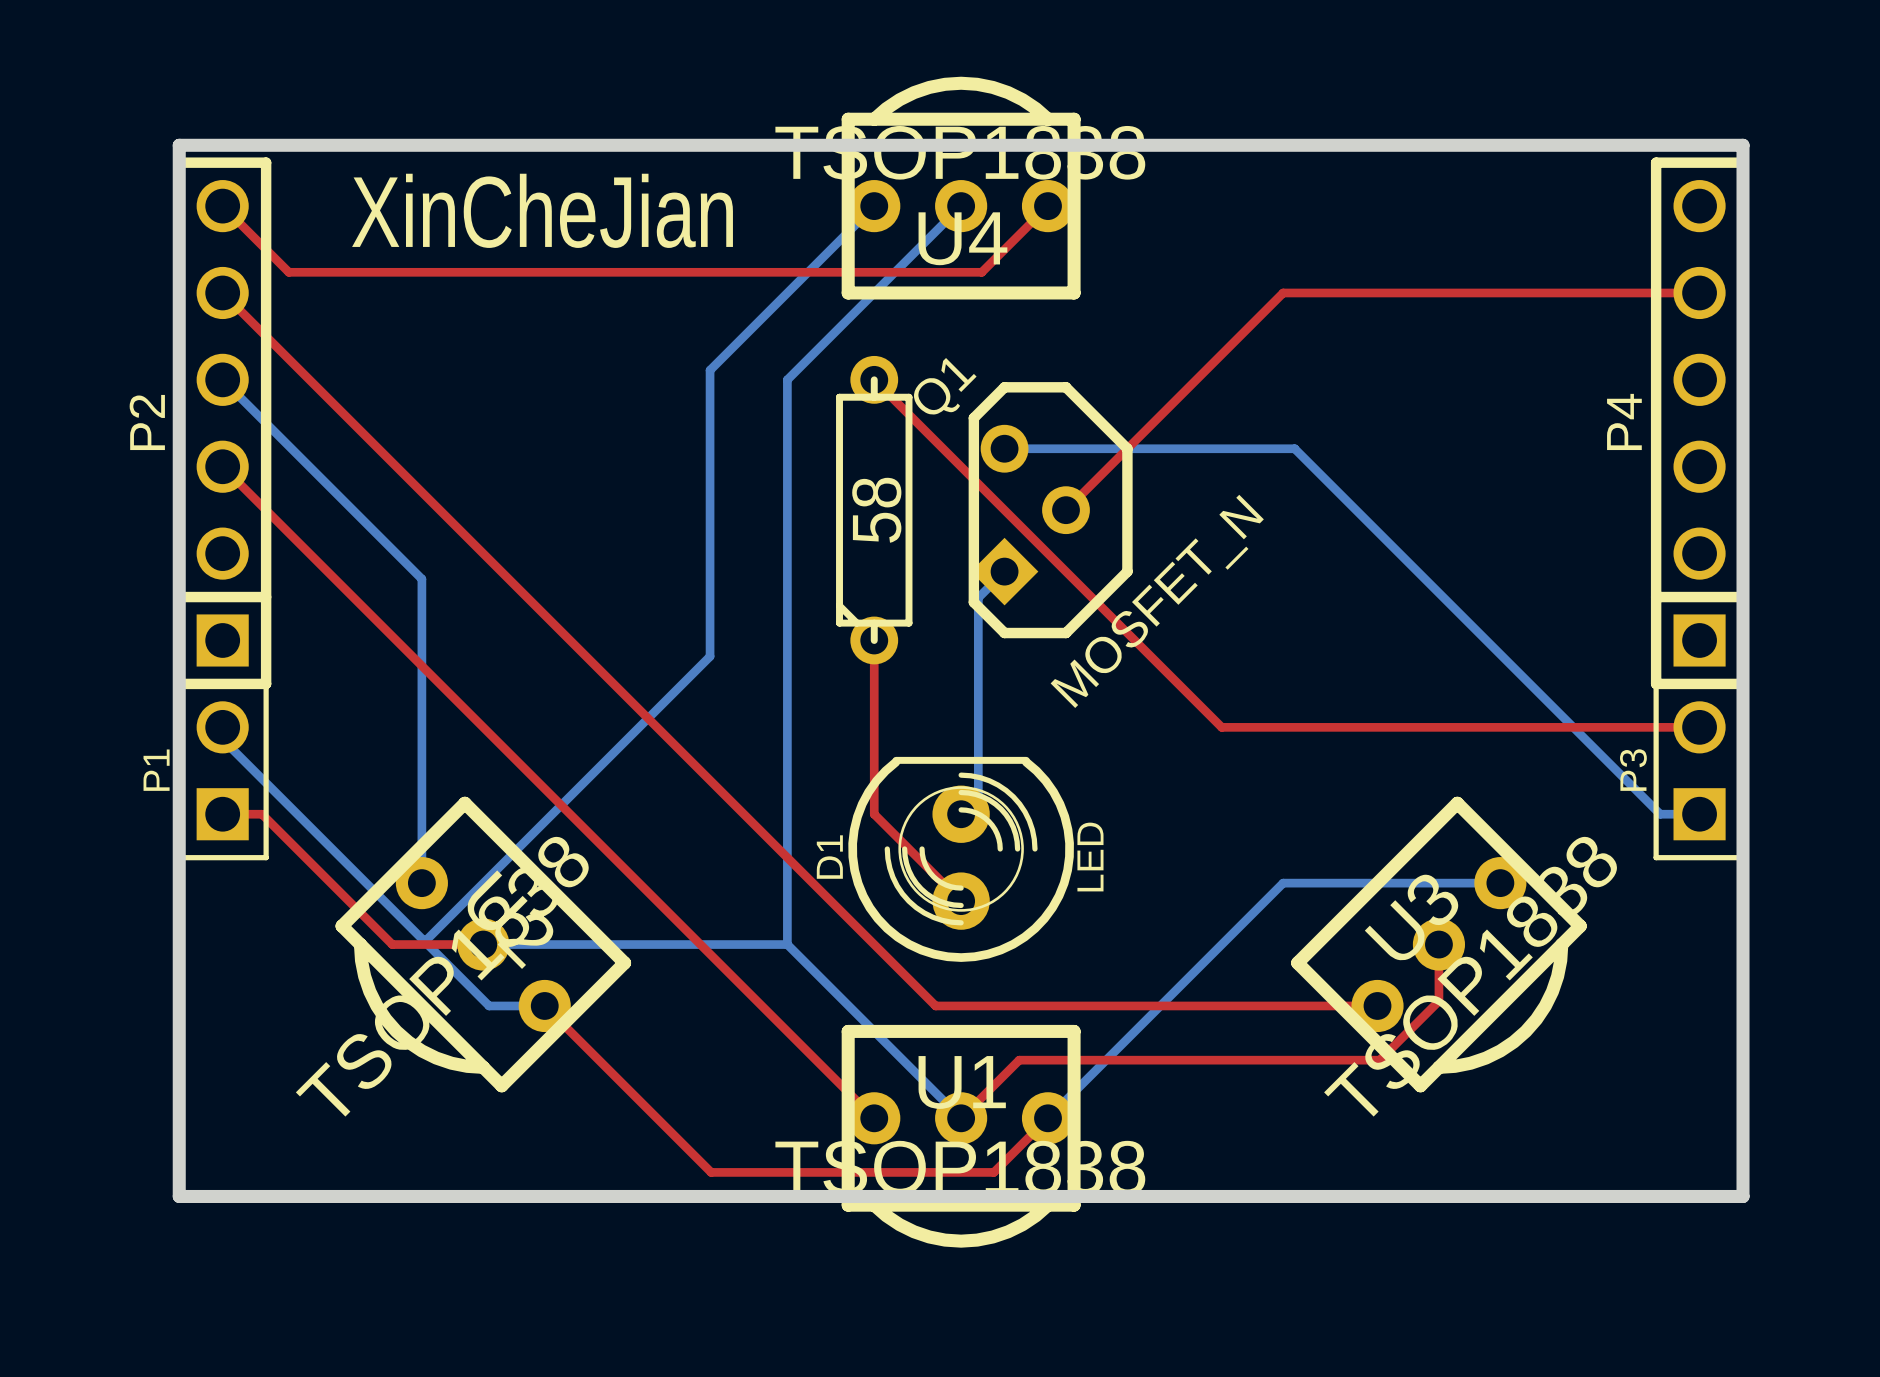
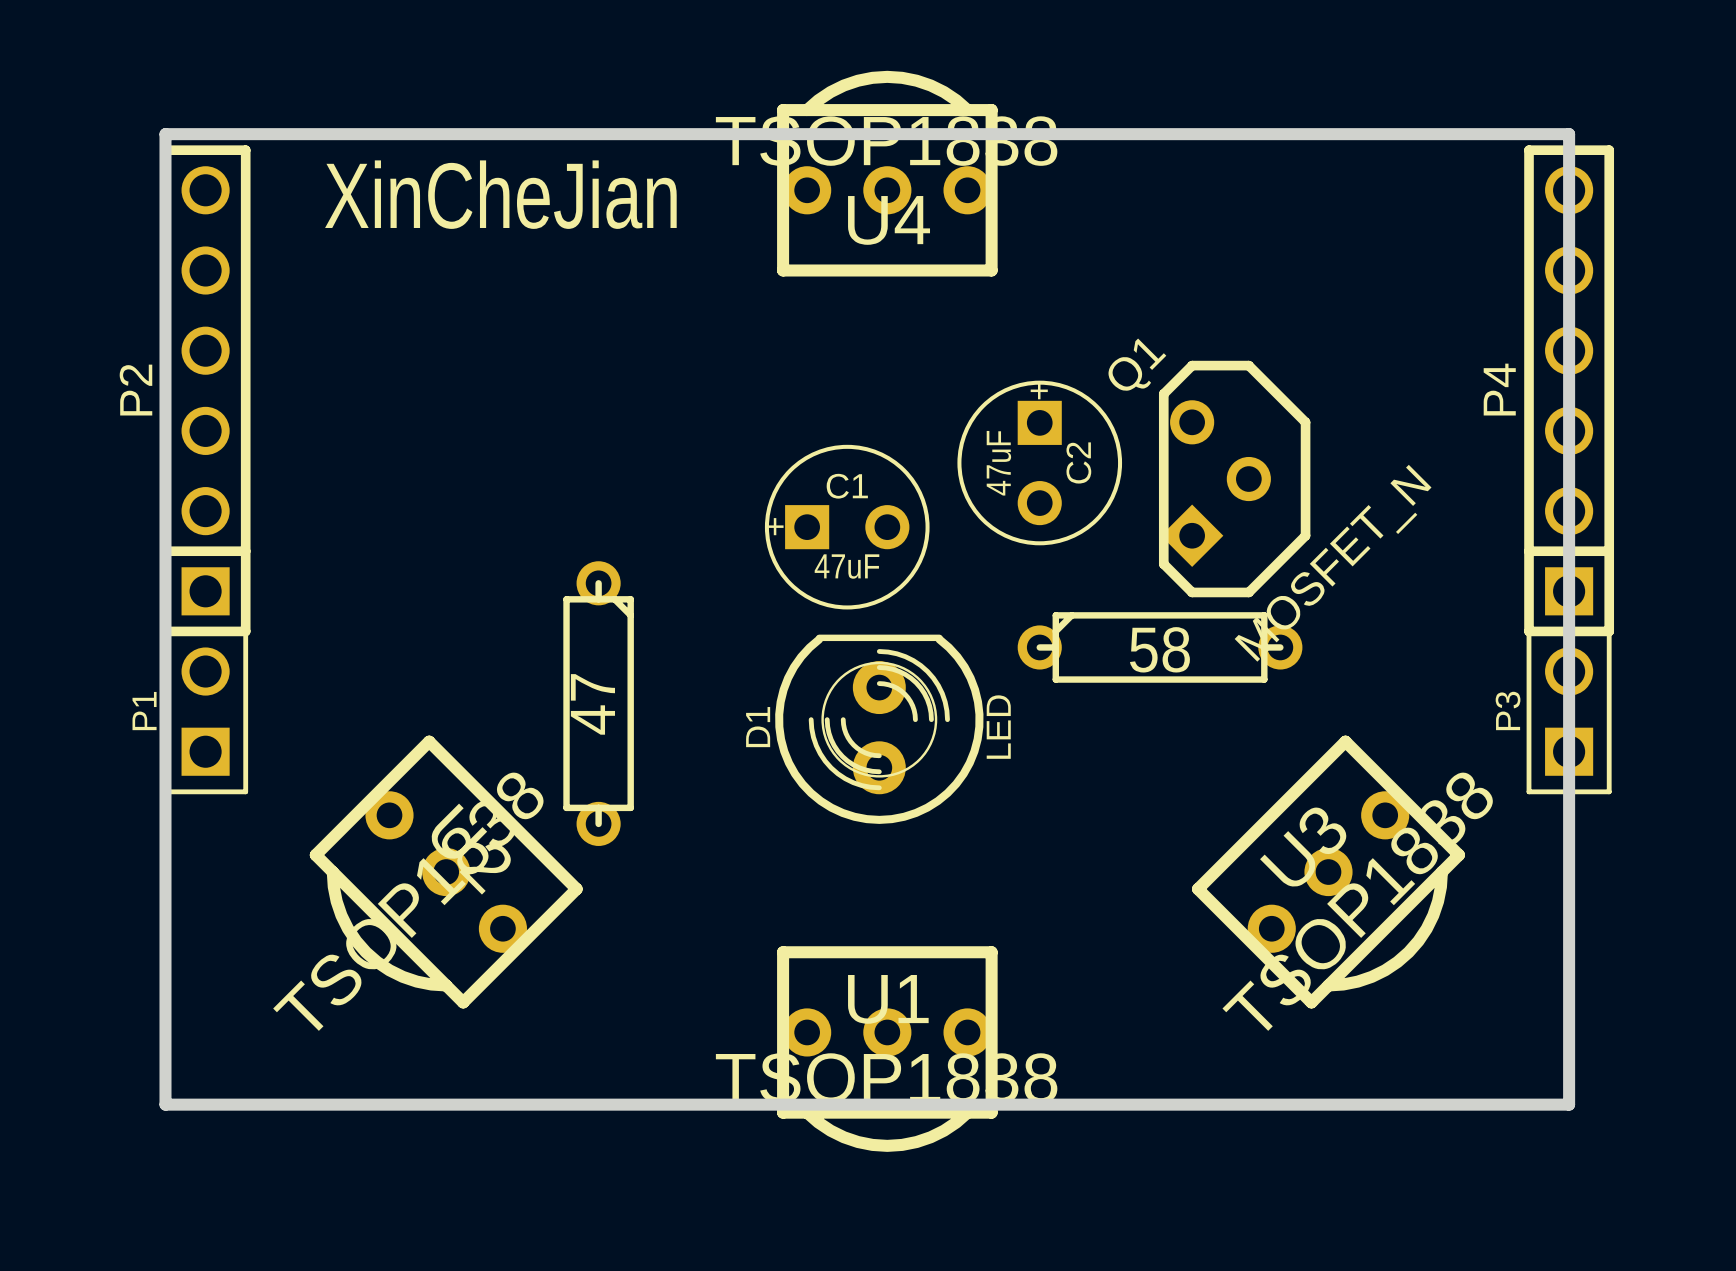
board edge: (1699, 145) (1743, 145) (1743, 1196) (1699, 1196) -> (1569, 134) (1569, 1104)
top track: (222, 206) (288, 272) (981, 272) (1048, 206) -> none
bottom track: (874, 206) (710, 370) (710, 656) (424, 941) -> none
bottom track: (961, 206) (787, 379) (787, 944) -> none
top track: (222, 292) (935, 1005) (1377, 1005) -> none
top track: (1699, 292) (1283, 292) (1065, 510) -> none
bottom track: (222, 379) (421, 579) (421, 883) -> none
top track: (874, 379) (1221, 727) (1699, 727) -> none
bottom track: (1004, 448) (1294, 448) (1660, 814) (1699, 814) -> none
top track: (222, 466) (874, 1118) -> none
C2: none -> 47uF (1039, 462)
part rotation: 0° (874, 510) -> 90° clockwise (1160, 647)
part position: (874, 510) -> (1160, 647)
Q1 position: (1050, 510) -> (1234, 479)
C1: none -> 47uF (847, 527)
bottom track: (1004, 571) (978, 597) (978, 797) (961, 814) -> none
top track: (874, 640) (874, 814) (961, 901) -> none
bottom track: (222, 727) (222, 739) (489, 1005) (544, 1005) -> none
part: none -> 47 (598, 703)
top track: (222, 814) (262, 814) (392, 944) (483, 944) -> none
D1 position: (961, 859) -> (879, 729)
bottom track: (1500, 883) (1283, 883) (1048, 1118) -> none
bottom track: (483, 944) (787, 944) -> none
bottom track: (787, 944) (961, 1118) -> none
top track: (1438, 944) (1438, 1001) (1379, 1060) (1019, 1060) (961, 1118) -> none
top track: (544, 1005) (711, 1172) (993, 1172) (1048, 1118) -> none

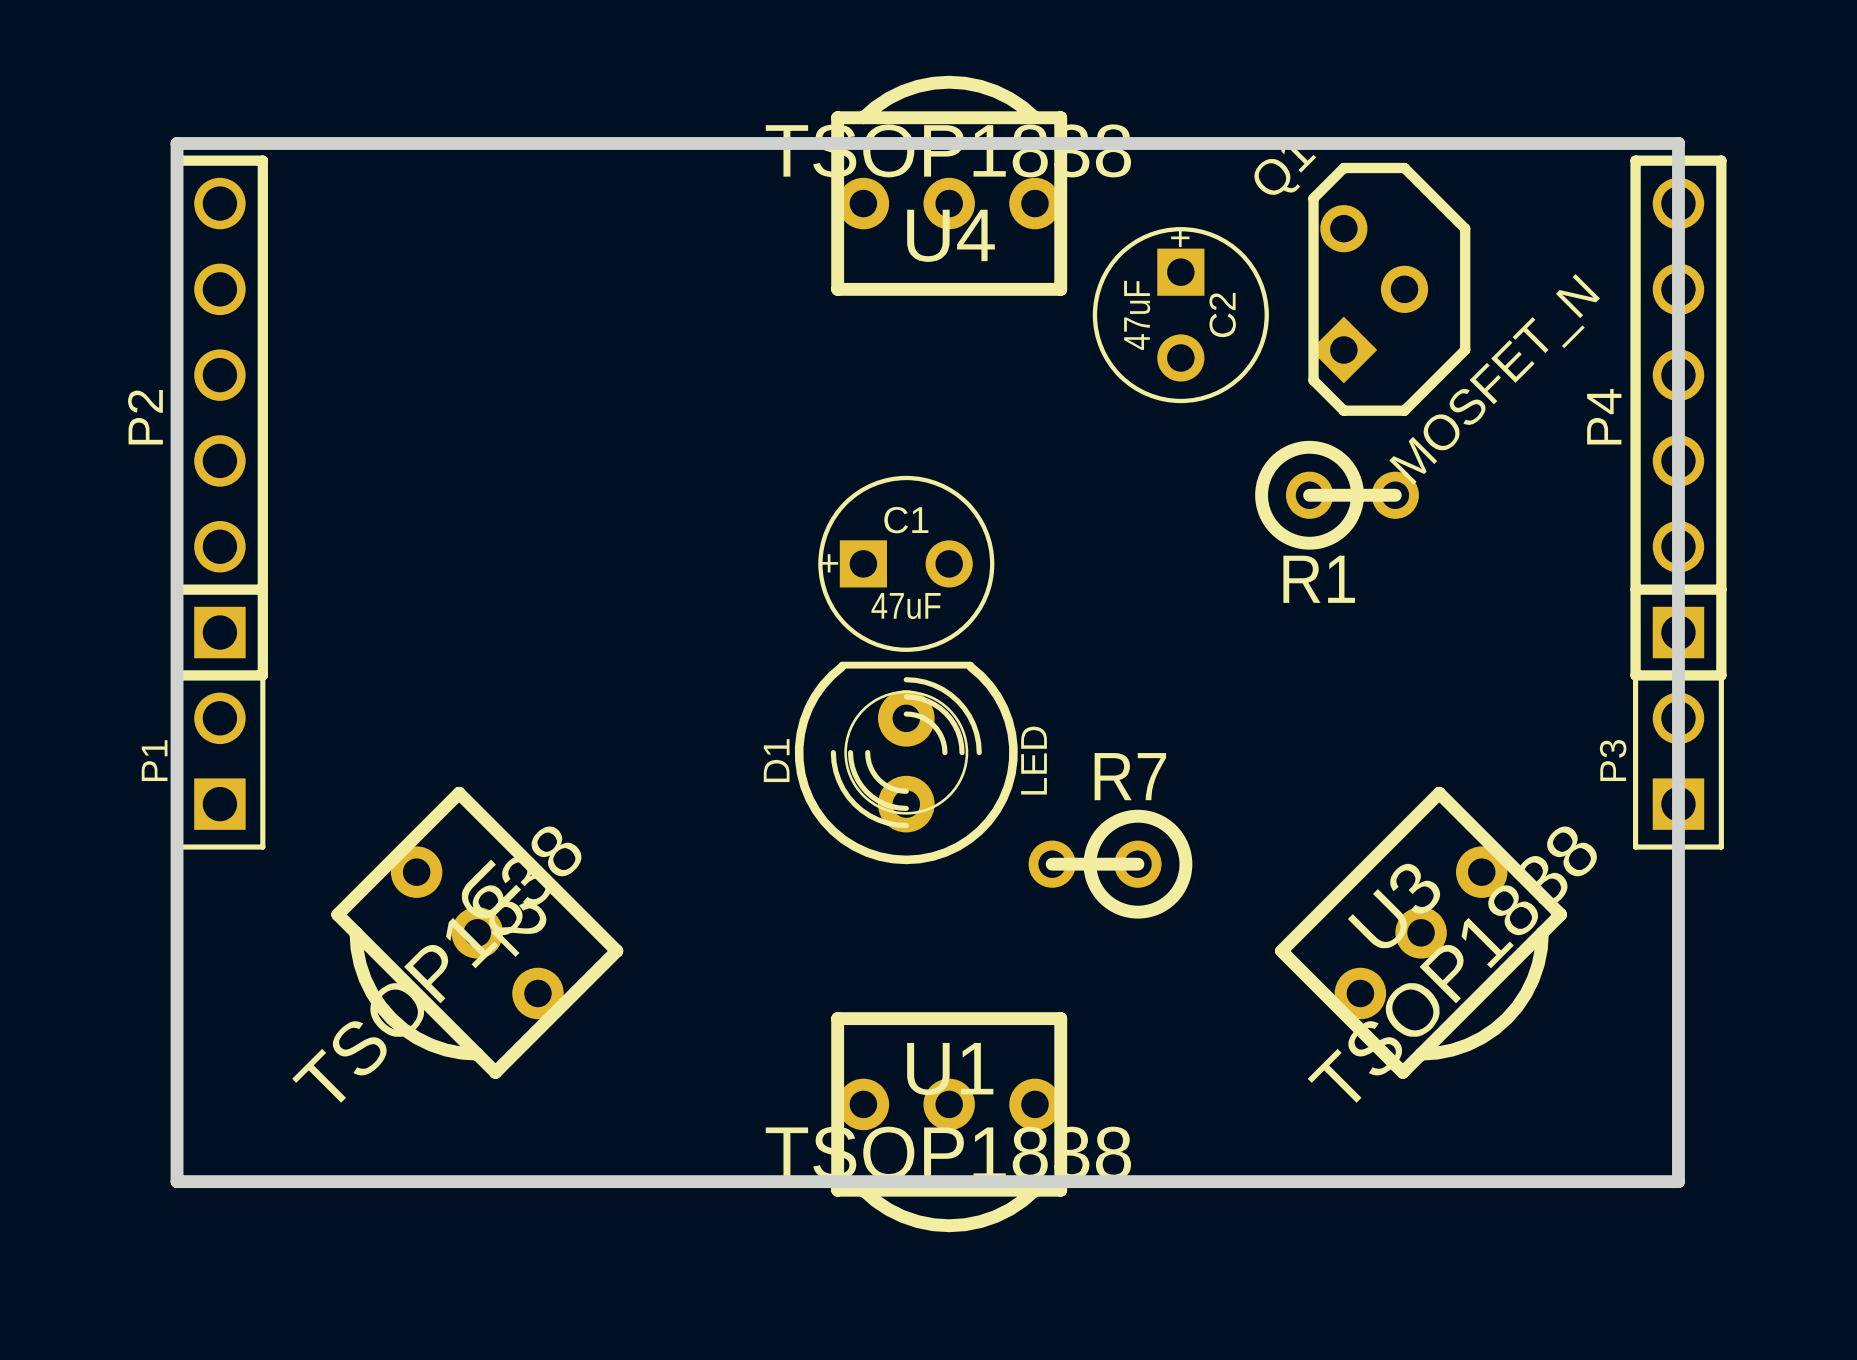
text: XinCheJian (500, 194) -> none
C2 position: (1039, 462) -> (1180, 315)
R1: none -> (1337, 495)
Q1 position: (1234, 479) -> (1389, 289)
part: 58 (1160, 647) -> none
part: 47 (598, 703) -> none
D1 position: (879, 729) -> (906, 762)
R7: none -> (1110, 864)

